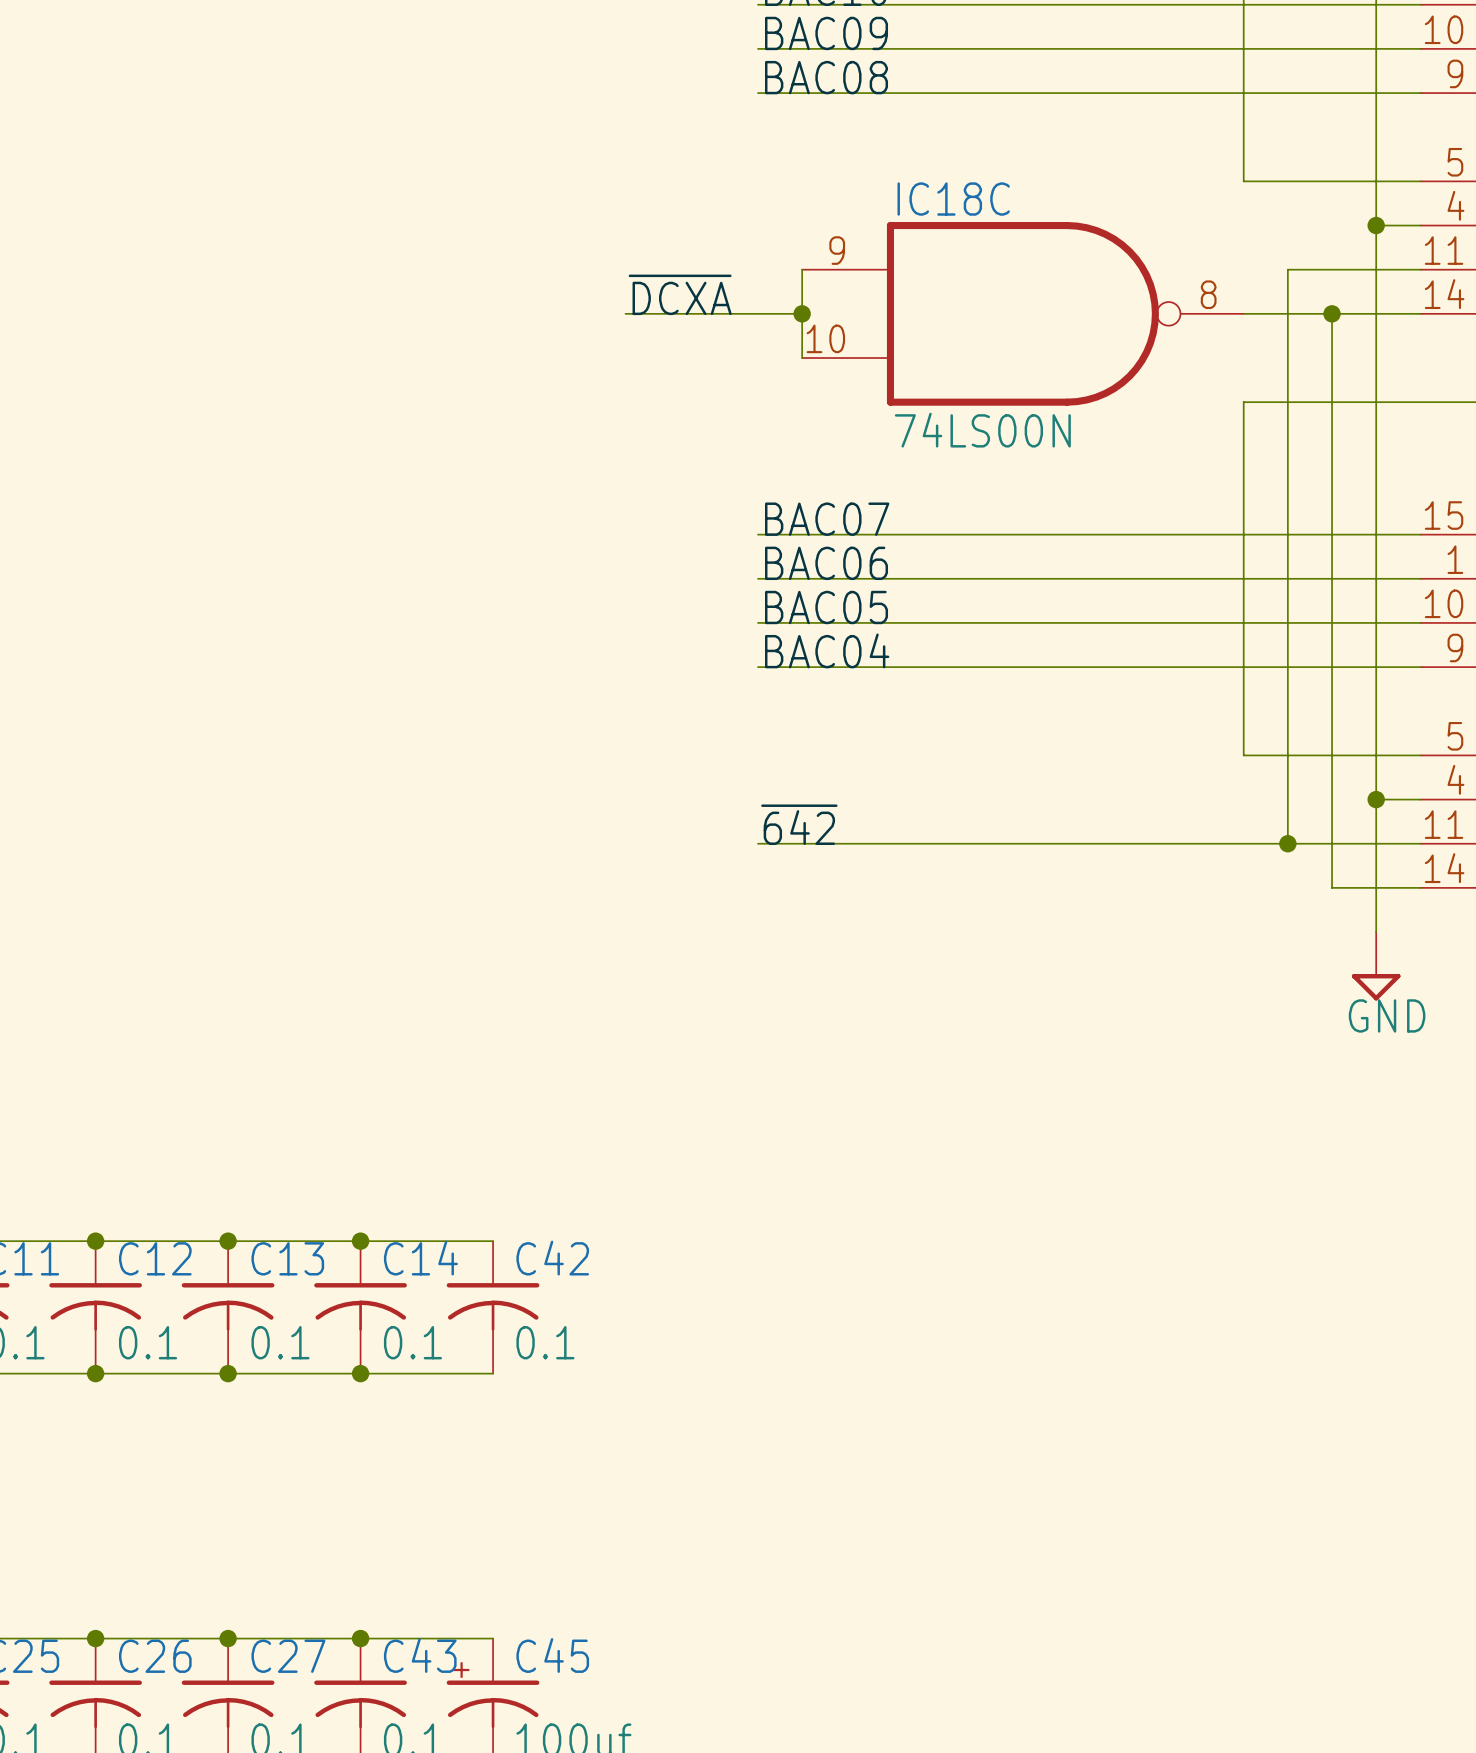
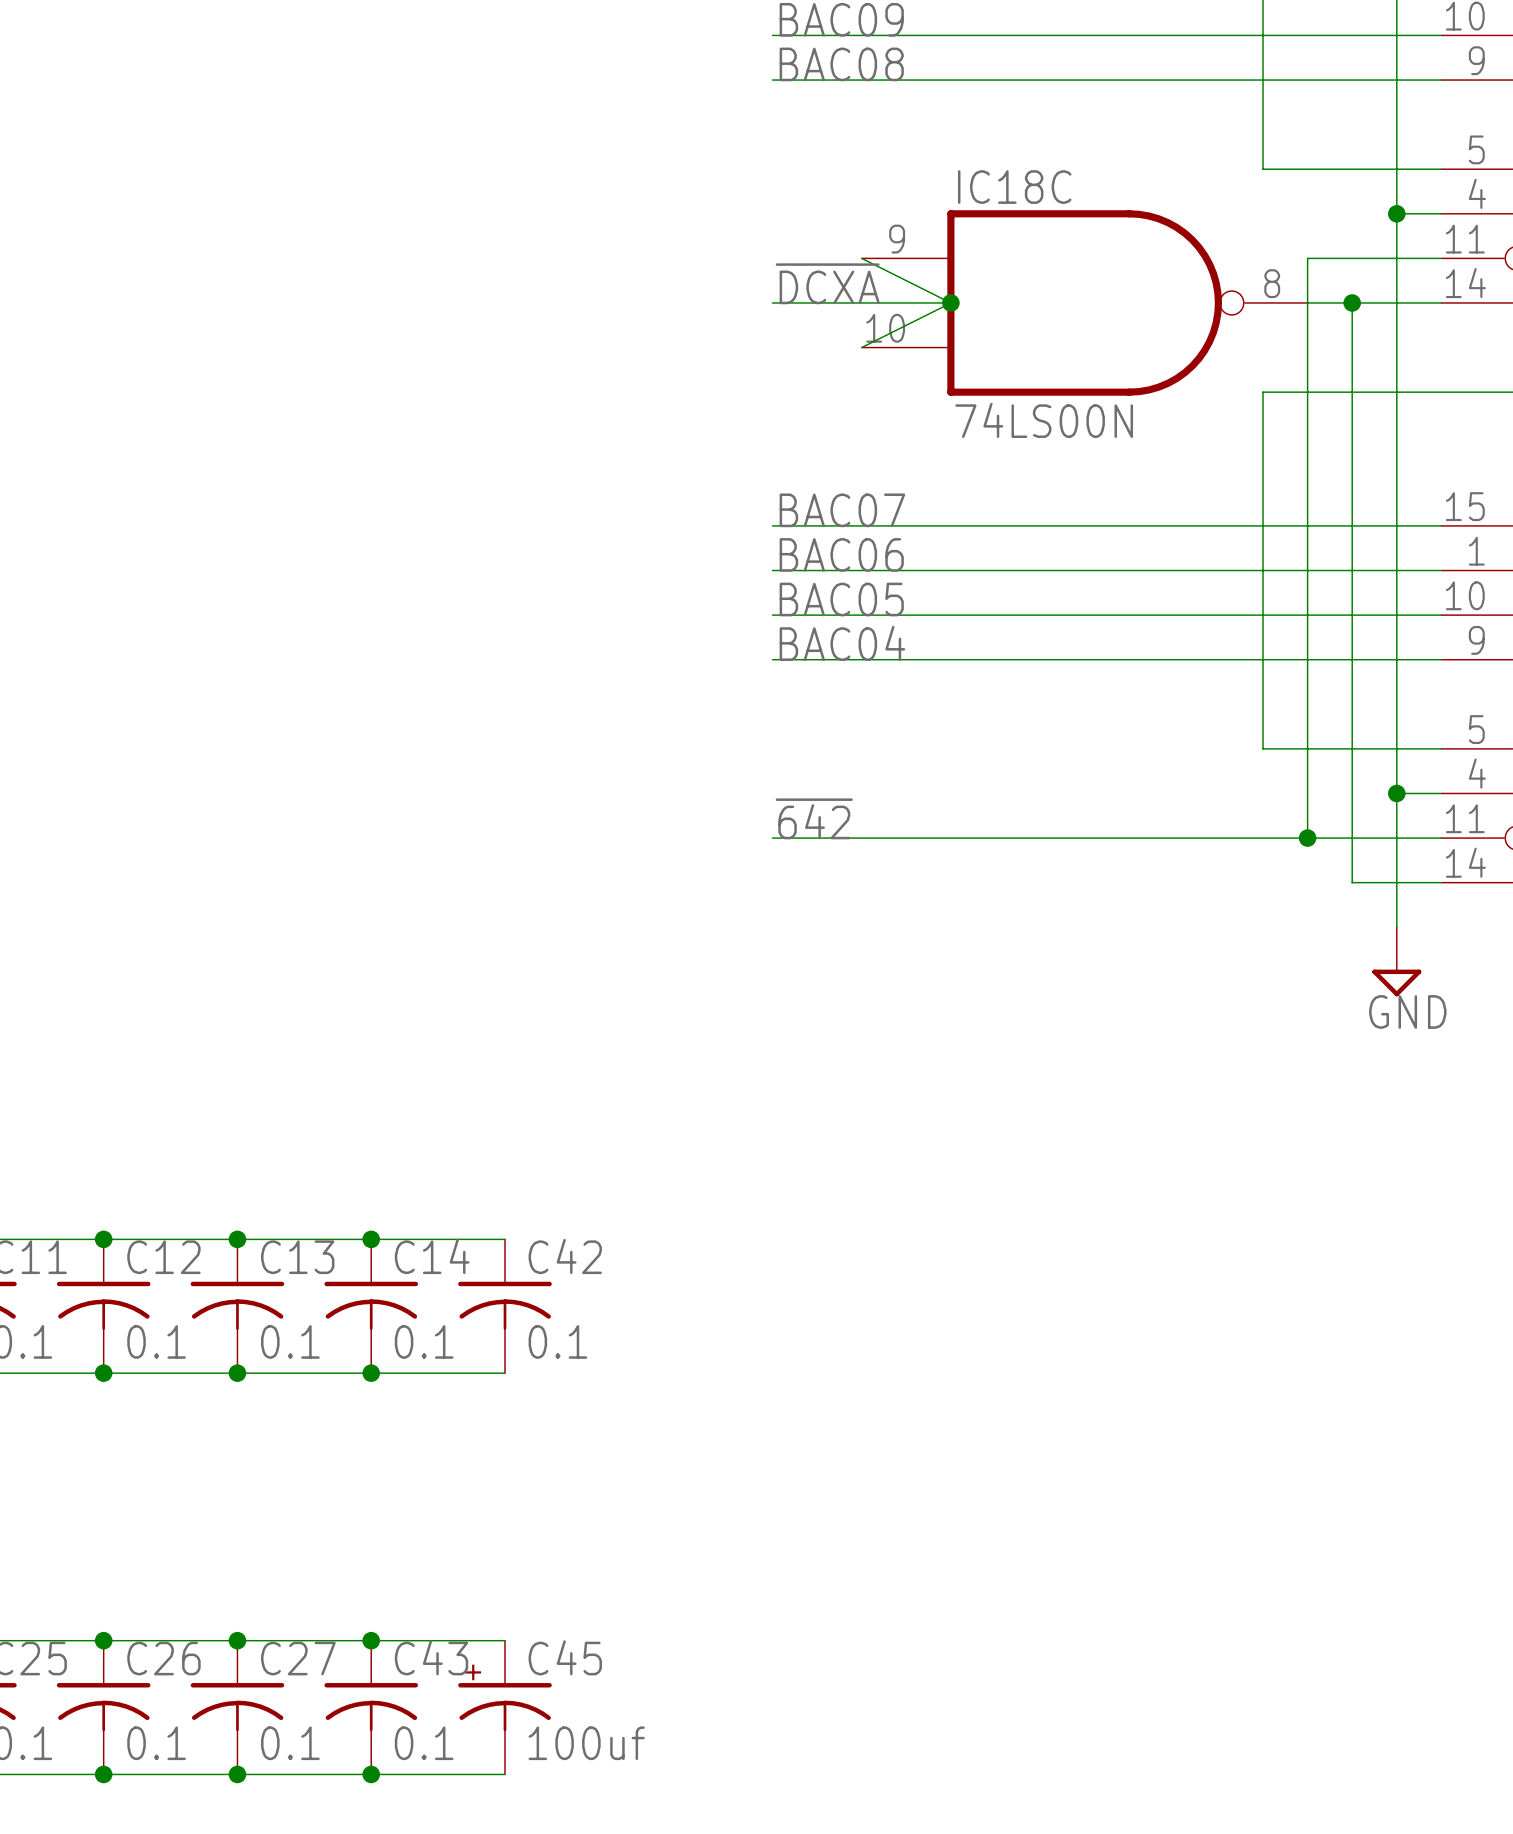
wire: (802, 269) (802, 358) -> none
wire: none -> (861, 258) (950, 302)
label position: ~{DCXA} (680, 294) -> ~{DCXA} (827, 283)
wire: (625, 313) (757, 313) -> (817, 302) (950, 302)
junction: (802, 313) -> none
wire: none -> (950, 302) (861, 347)
junction: none -> (950, 302)
IC18C position: (1022, 313) -> (1084, 302)

